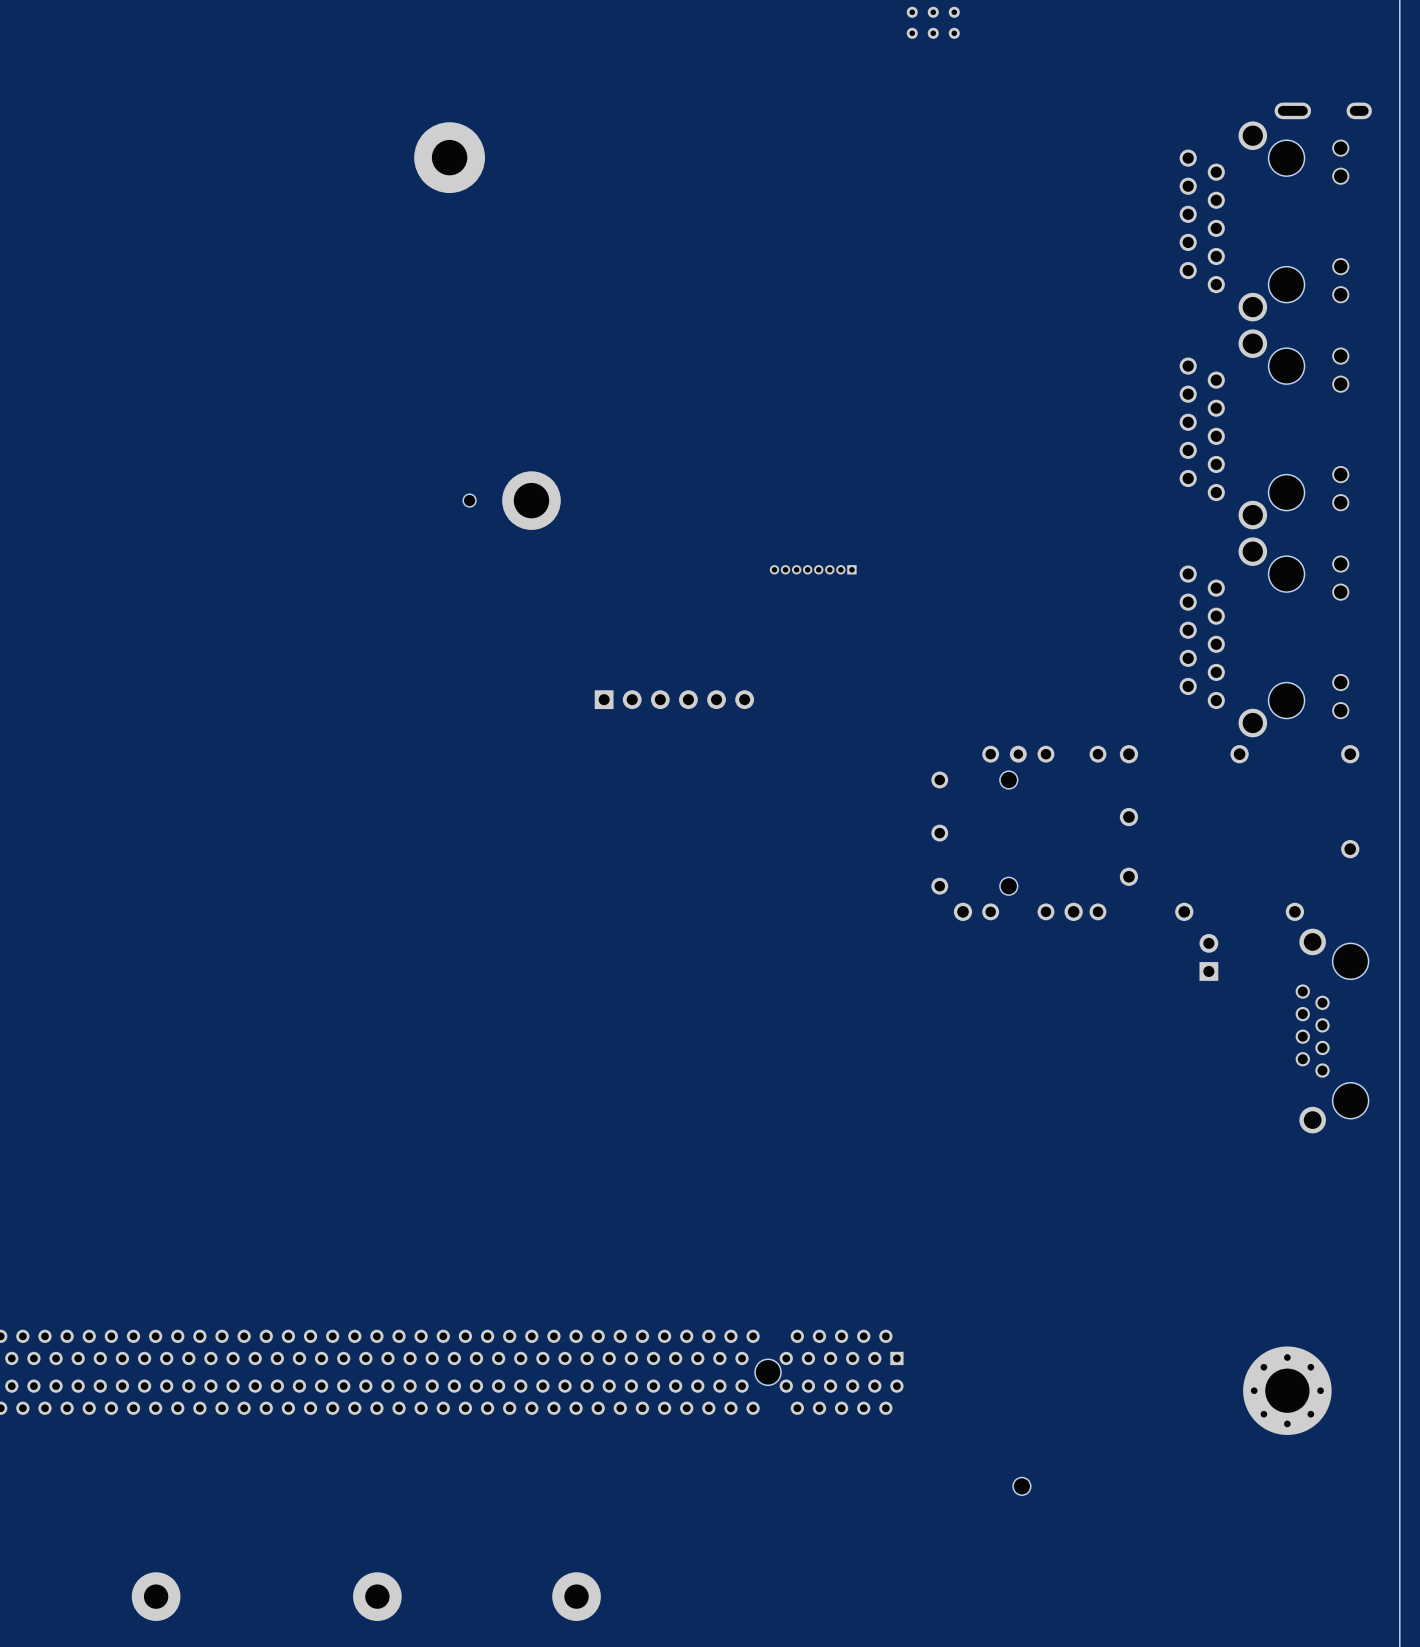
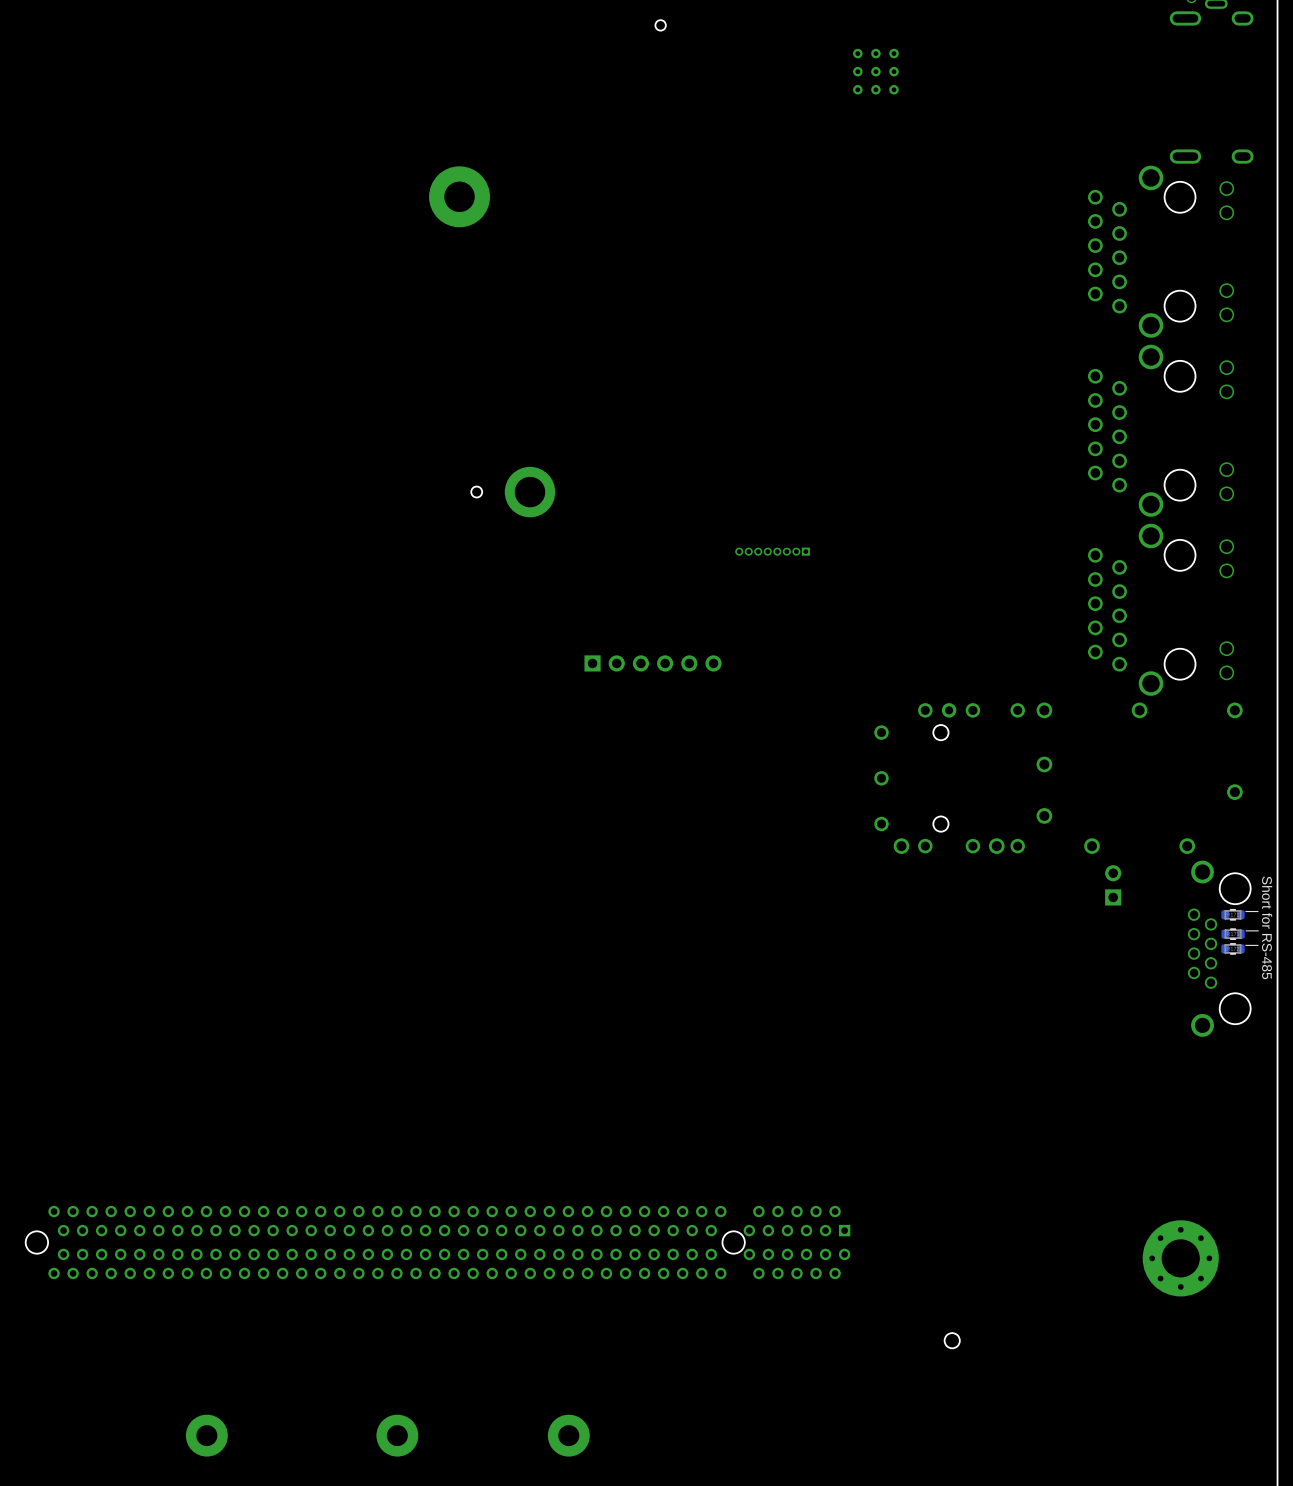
part: none -> (1232, 914)
text: none -> | (1251, 911)
part: none -> (1233, 934)
text: none -> | (1252, 930)
text: none -> Short for RS-485 (1267, 927)
part: none -> (1232, 948)
text: none -> | (1251, 945)

